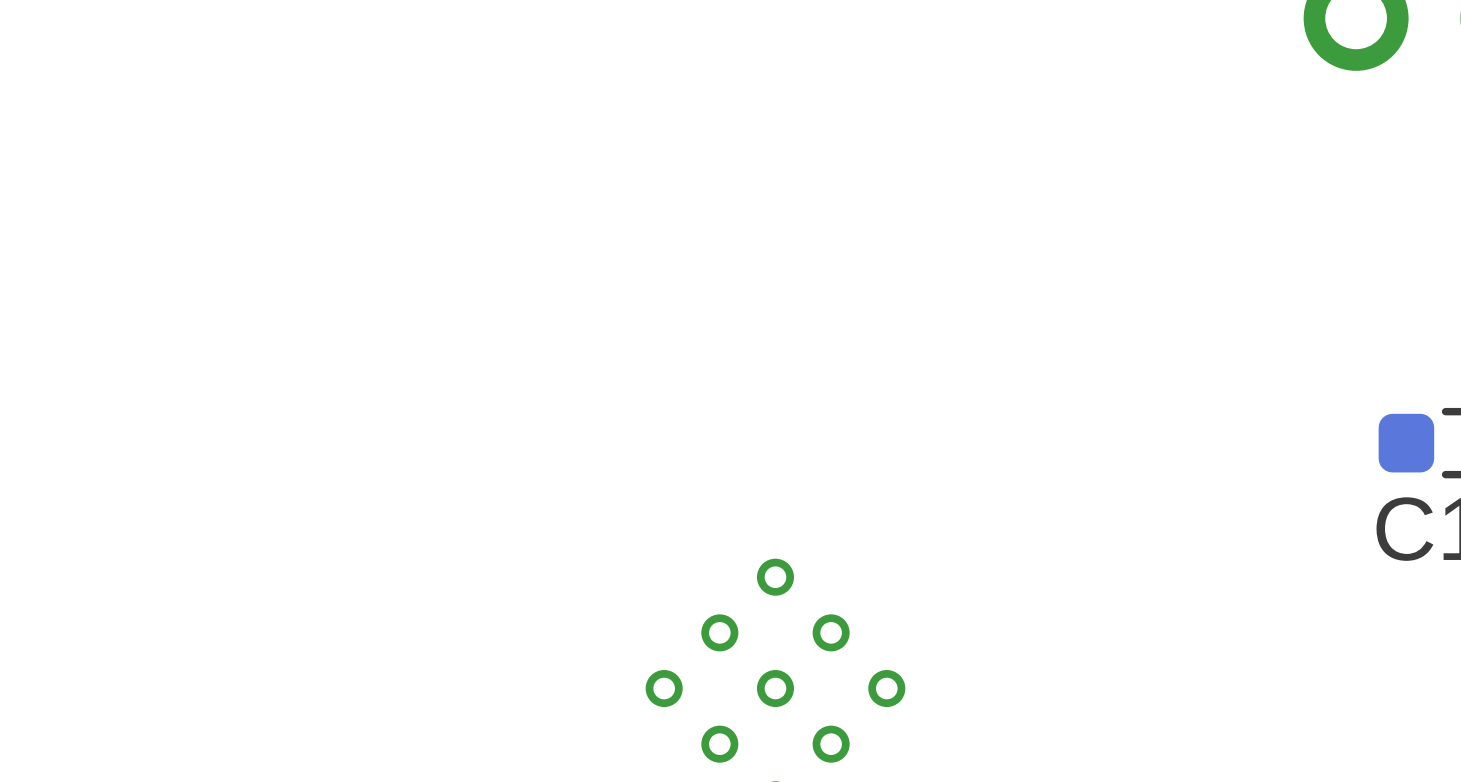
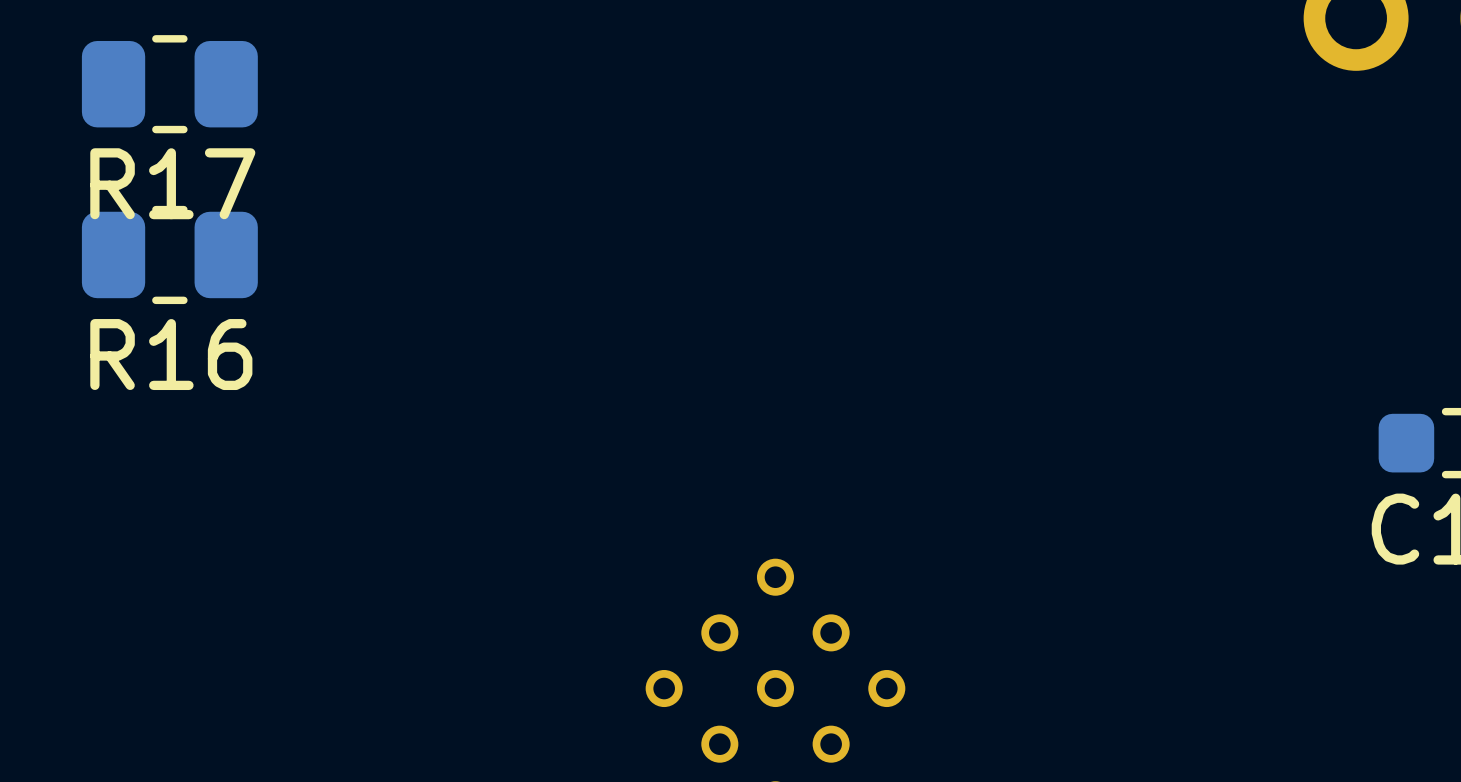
R17: none -> (169, 84)
R16: none -> (169, 254)

